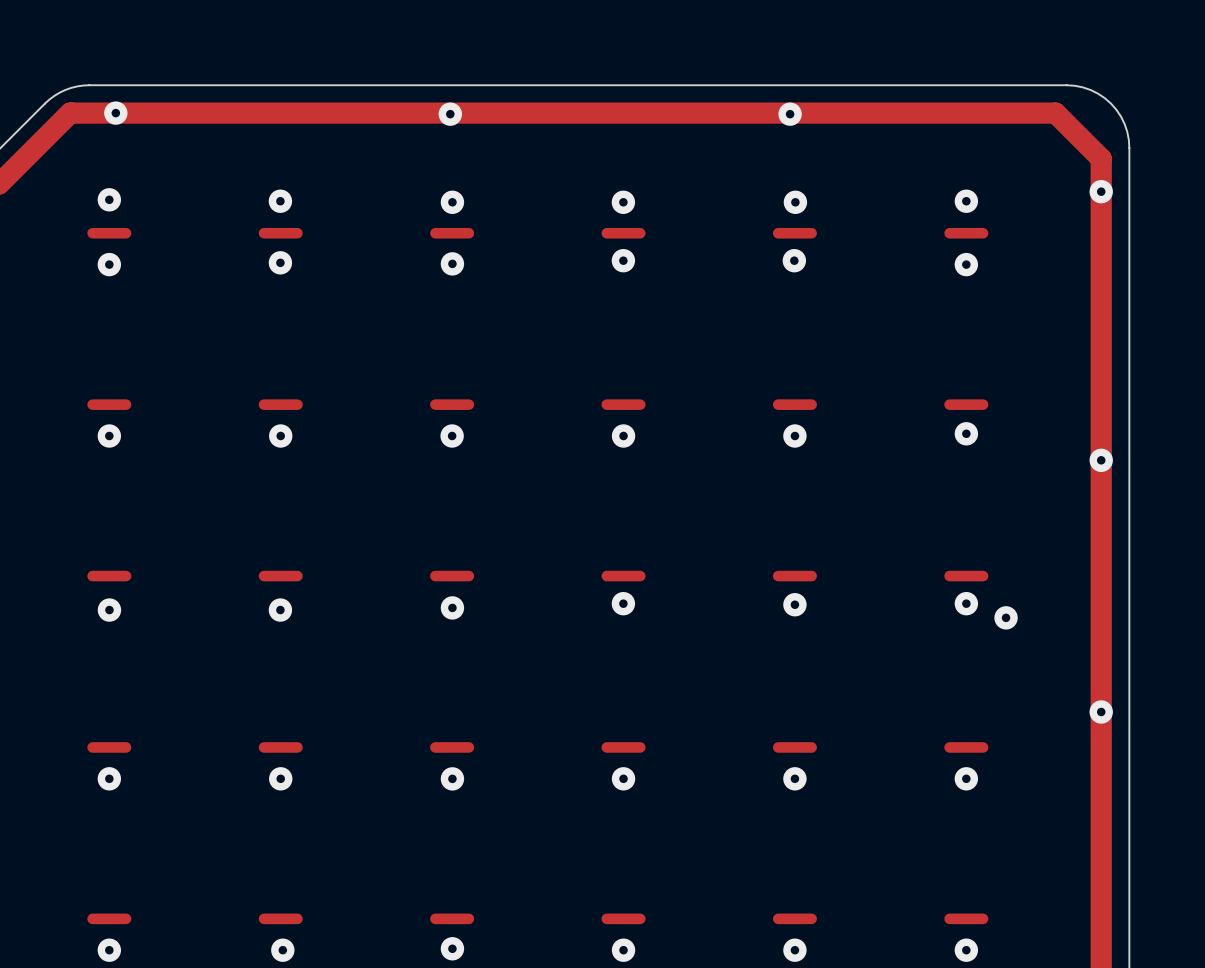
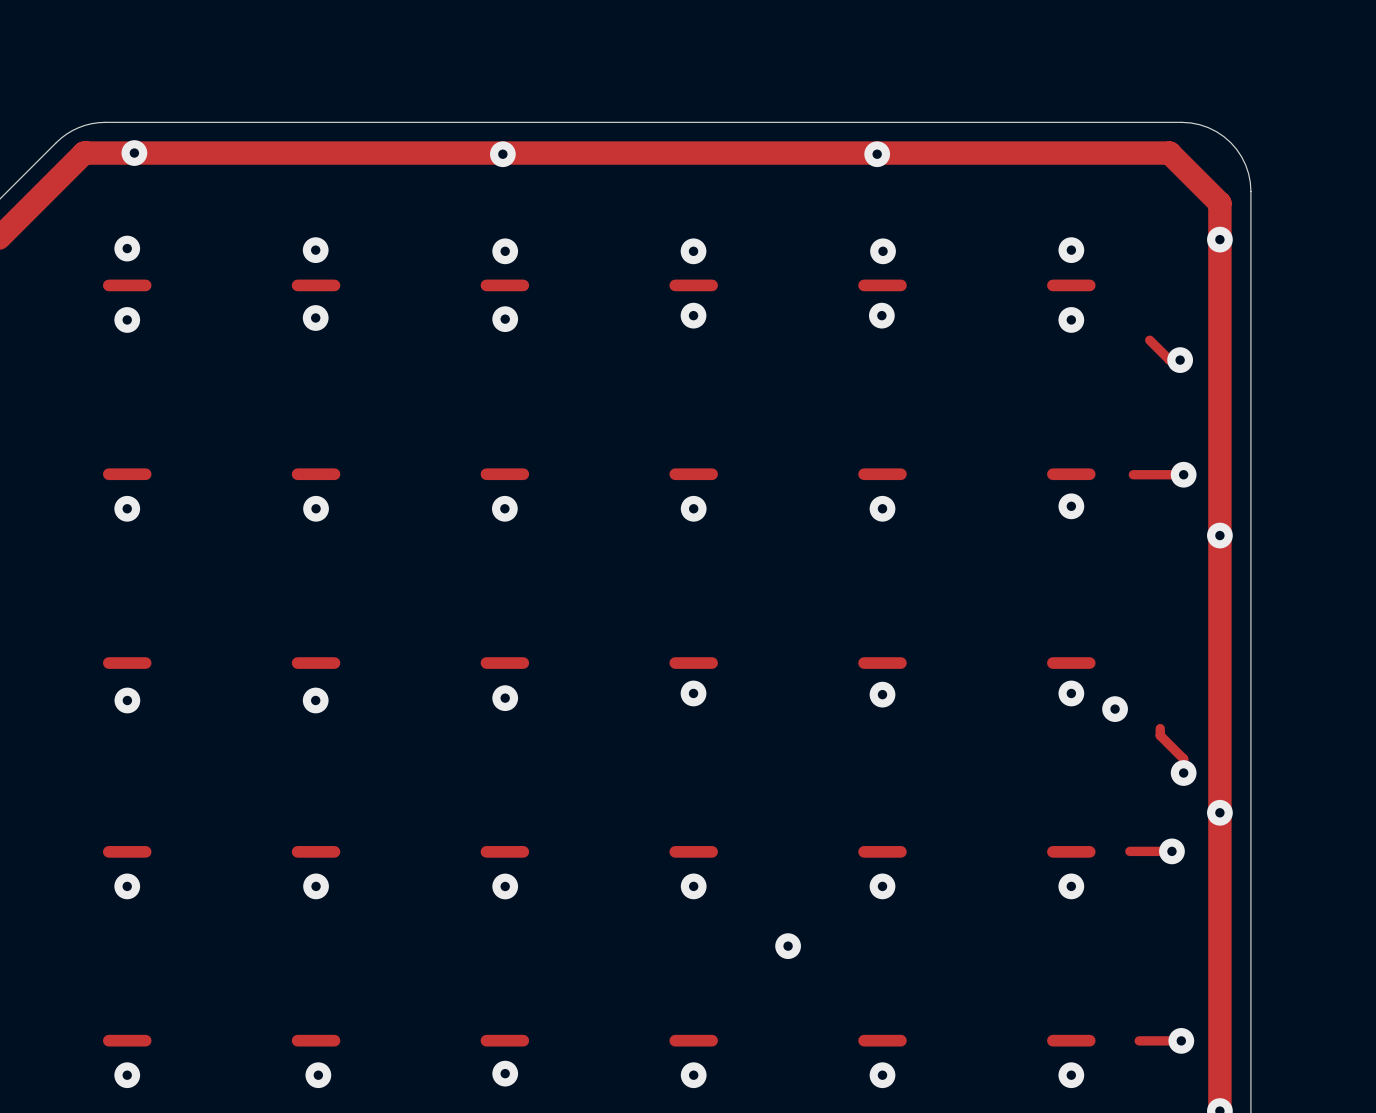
track: none -> (1149, 340) (1169, 360) (1180, 360)
via: none -> (1180, 360)
track: none -> (1133, 474) (1183, 474)
via: none -> (1183, 474)
track: none -> (1160, 728) (1160, 735) (1183, 758) (1183, 773)
via: none -> (1183, 773)
track: none -> (1129, 851) (1171, 851)
via: none -> (1171, 851)
via: none -> (788, 946)
track: none -> (1139, 1040) (1181, 1040)
via: none -> (1181, 1040)

